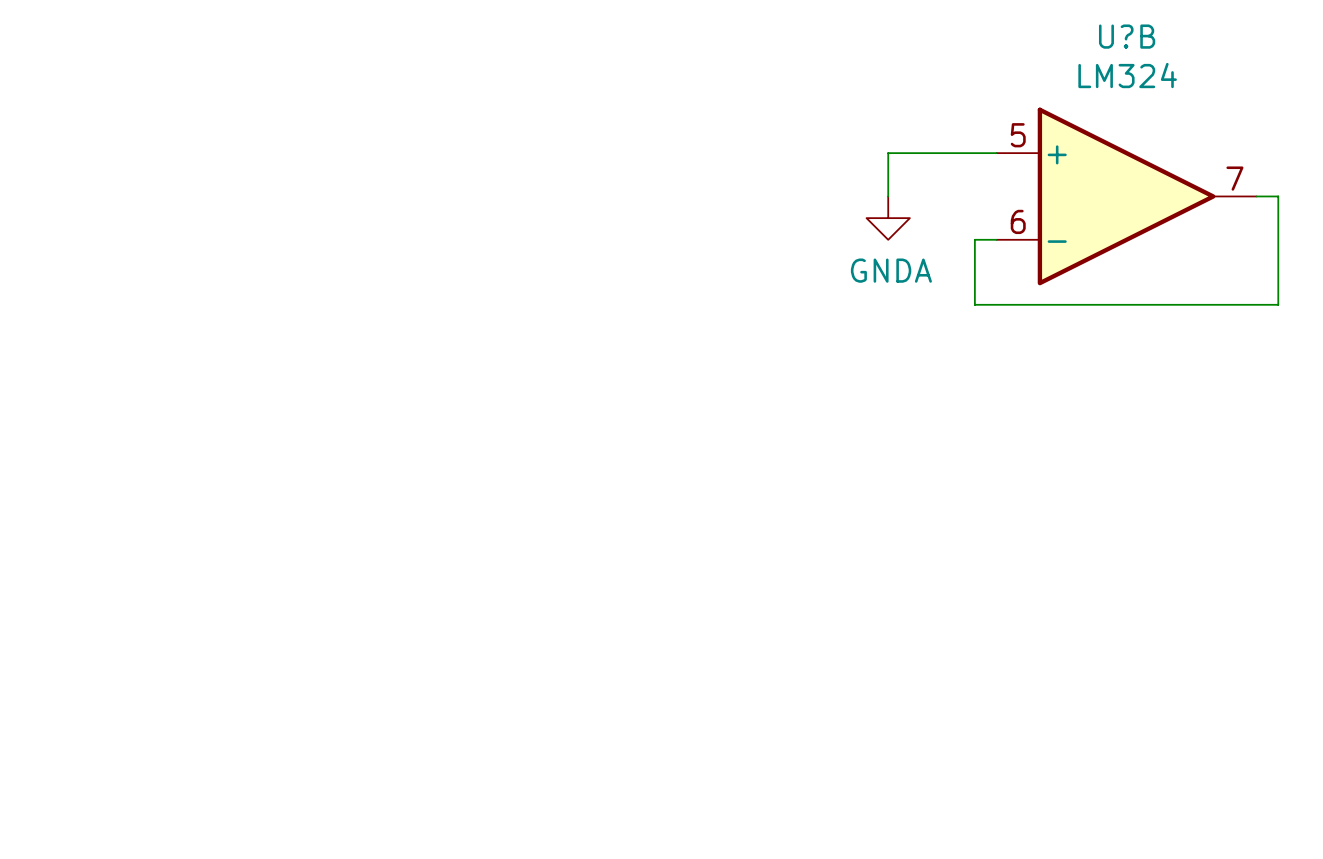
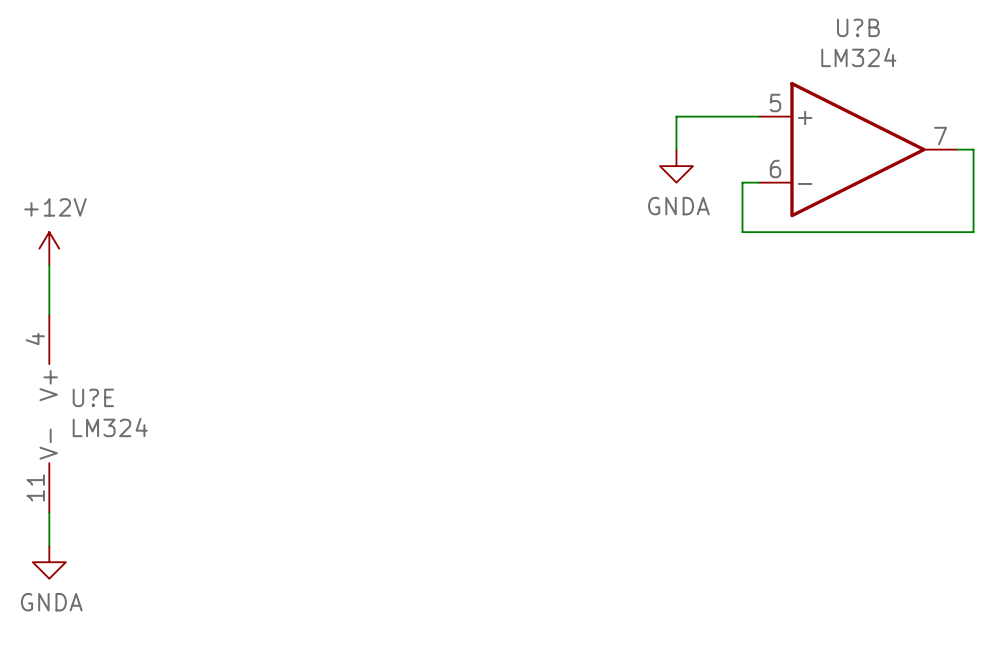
power symbol: none -> +12V (49, 248)
wire: none -> (49, 265) (49, 314)
U?E: none -> LM324 (49, 413)
wire: none -> (49, 512) (49, 545)
power symbol: none -> GNDA (49, 562)

